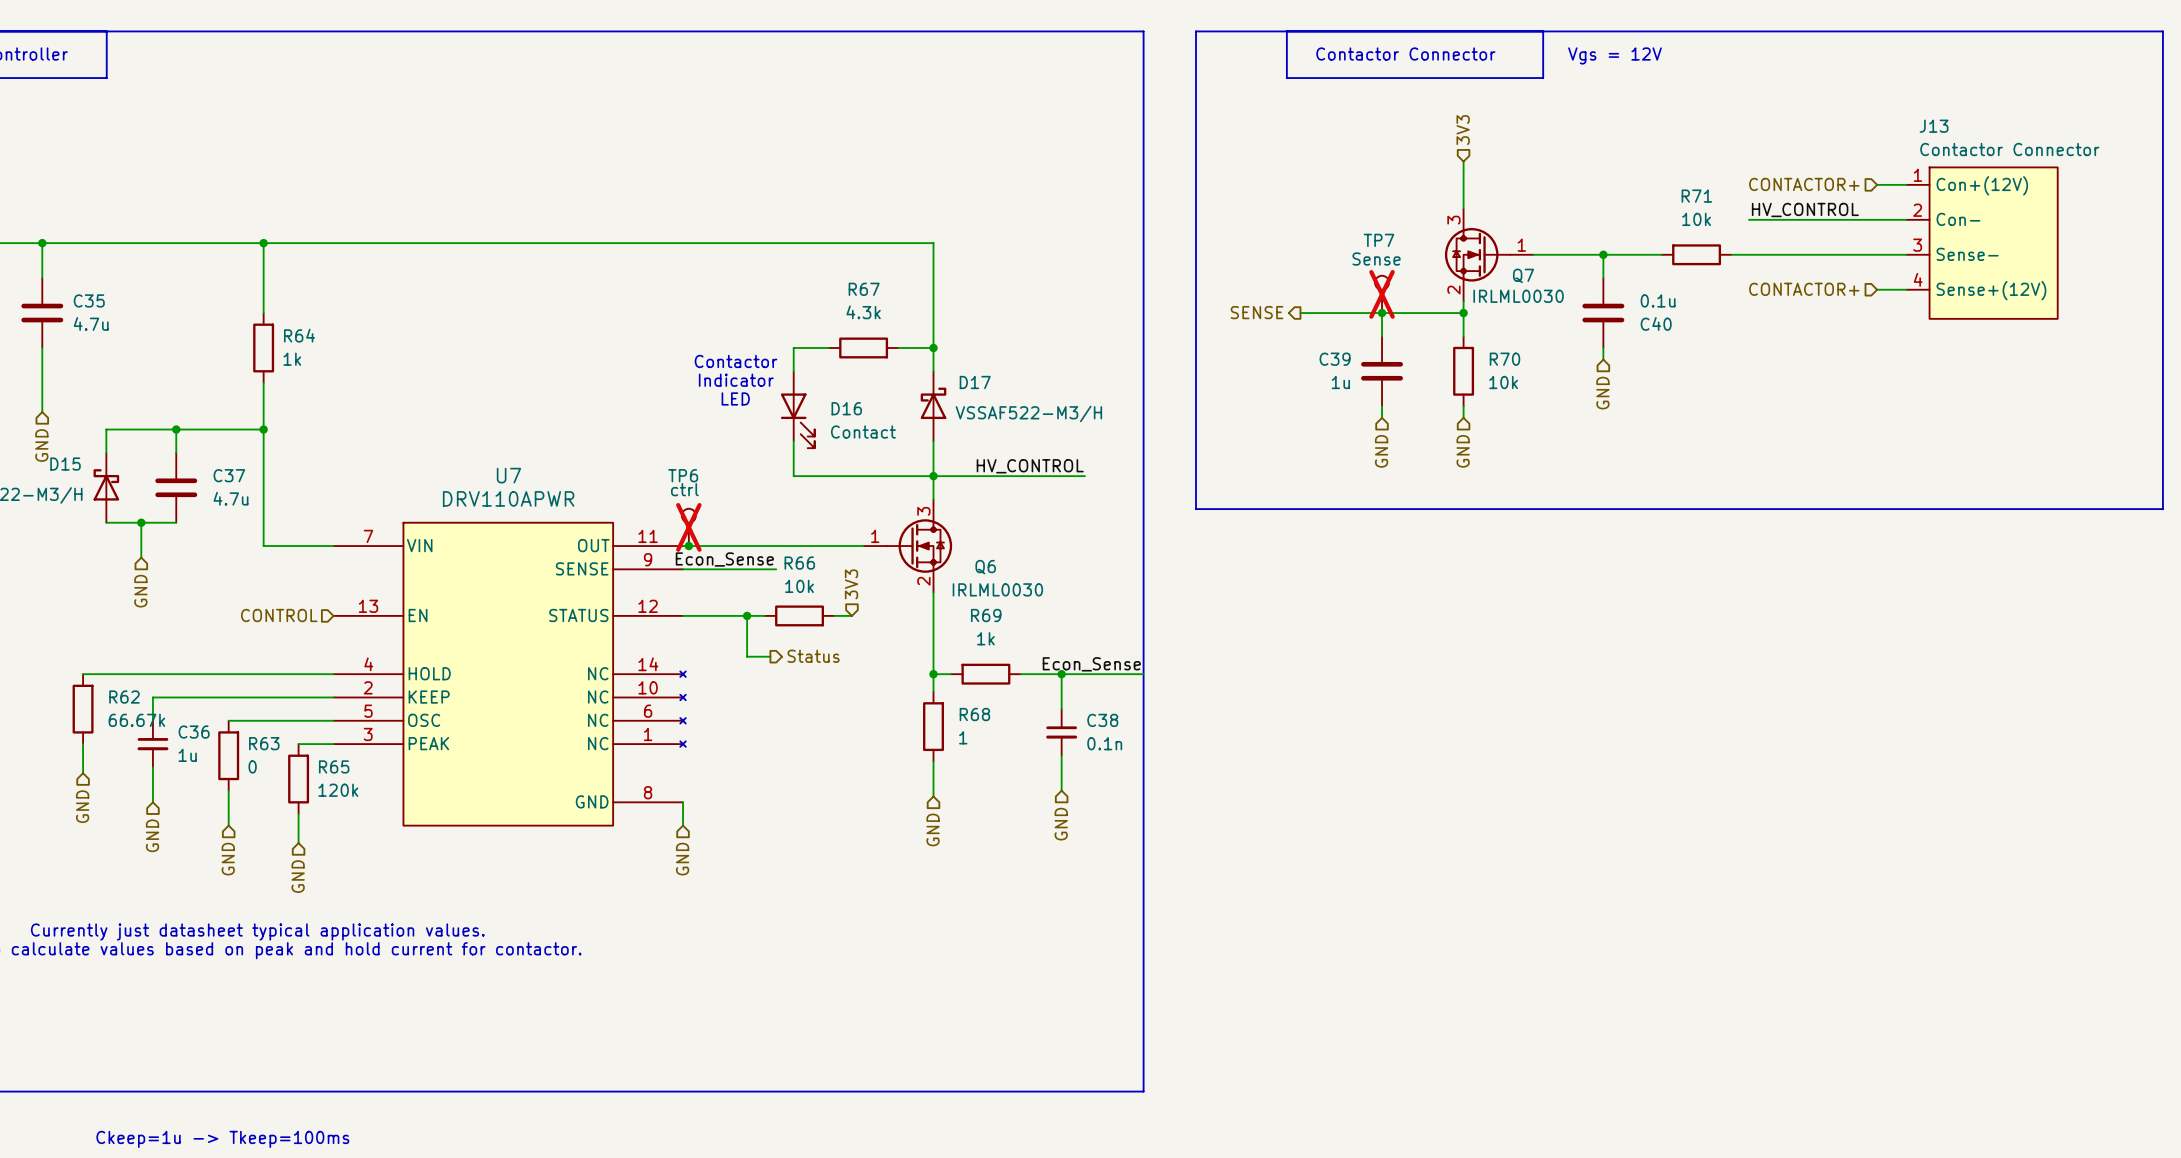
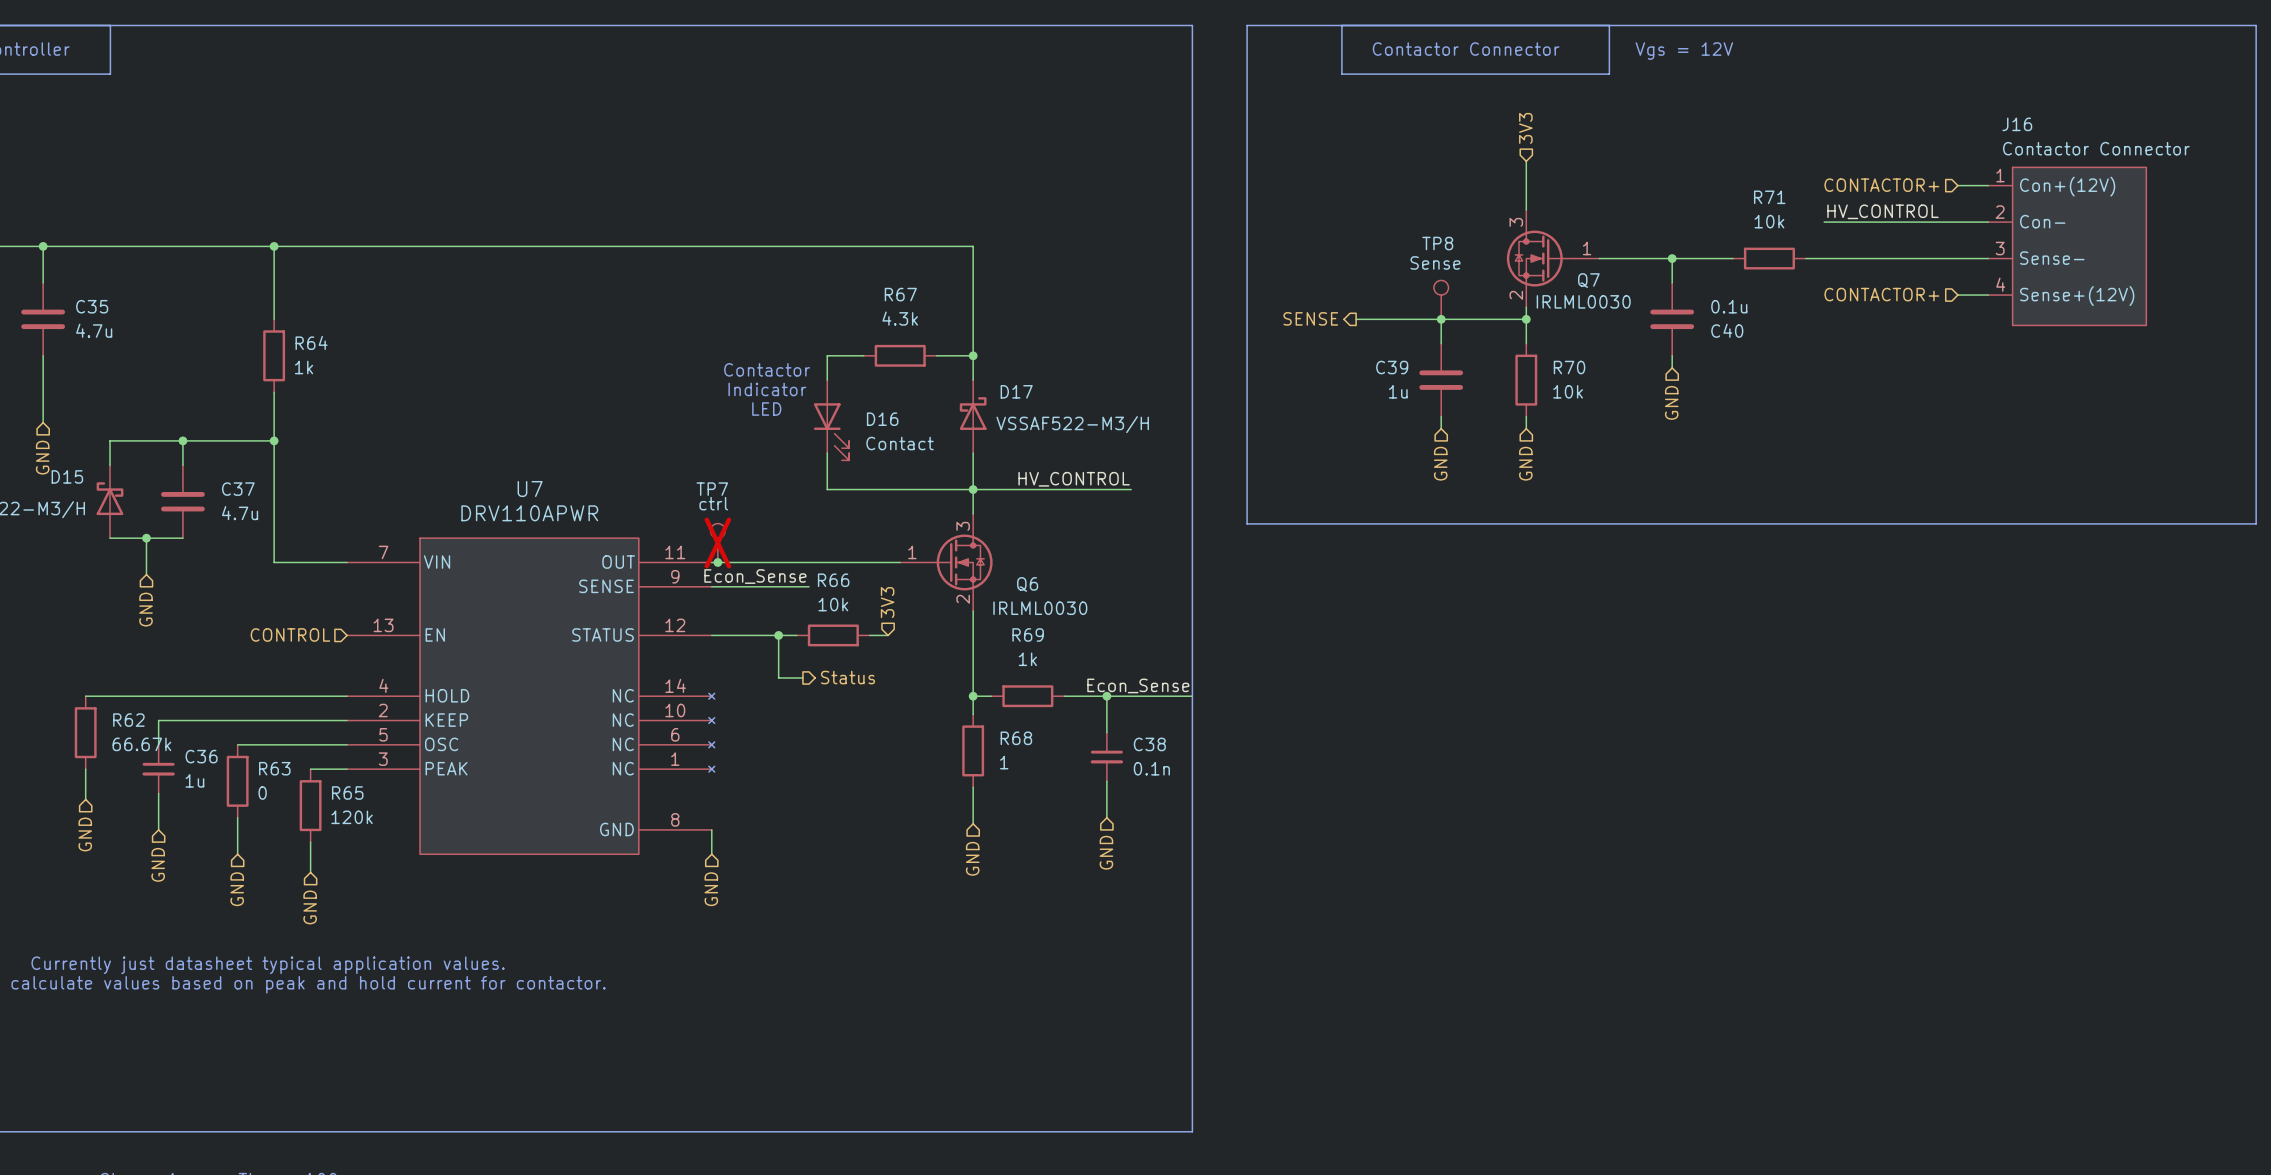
J13 name: J13 (1934, 126) -> J16 (2017, 124)
TP7 name: TP7 (1378, 240) -> TP8 (1437, 243)
TP7 do-not-place cross: (1382, 294) -> none
TP6 name: TP6 (683, 475) -> TP7 (712, 489)

